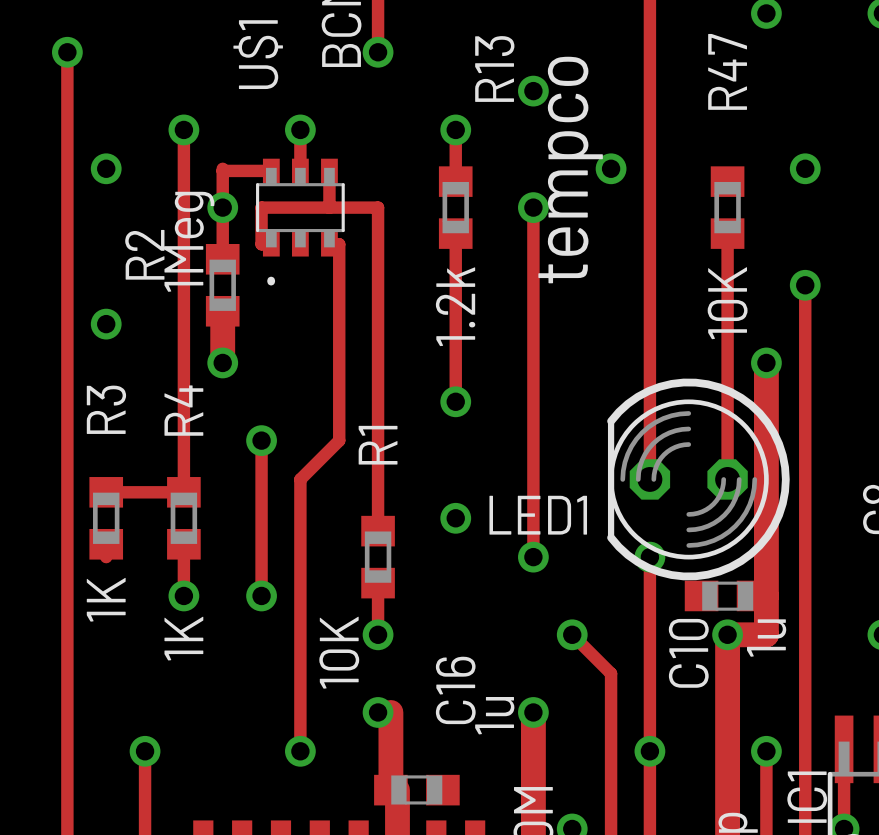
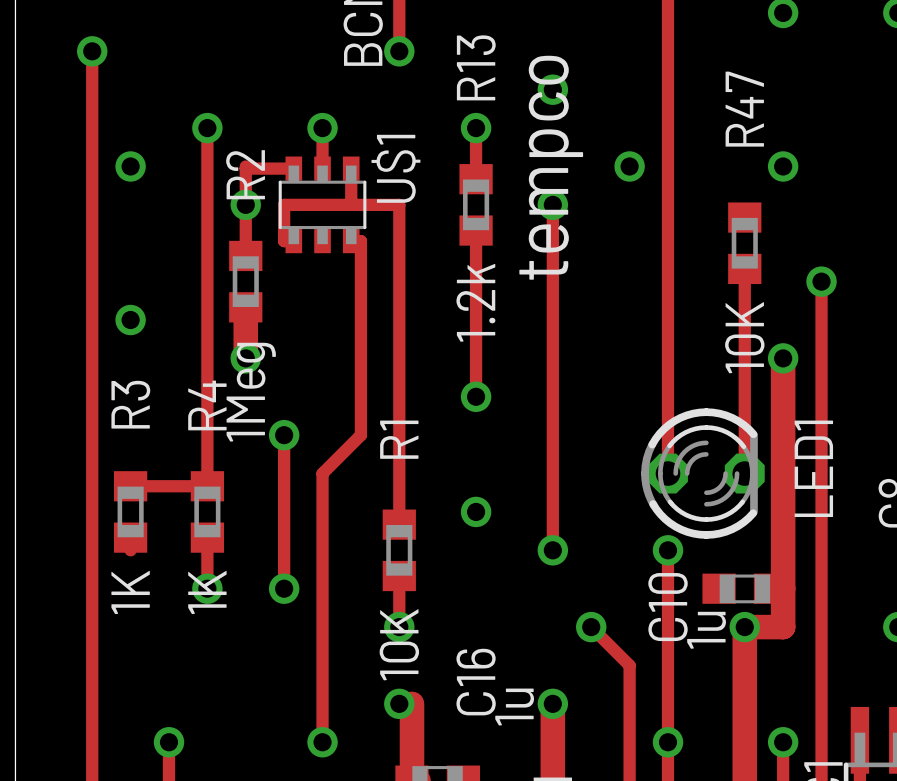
U$1 name position: U$1 (258, 54) -> U$1 (395, 168)
R13 name position: R13 (494, 69) -> R13 (476, 67)
via position: (805, 168) -> (783, 166)
text position: tempco (570, 170) -> tempco (551, 167)
R47 position: (727, 207) -> (744, 243)
track: (727, 233) (727, 272) -> none
R2 value position: 1Meg (189, 241) -> 1Meg (251, 392)
R2 name position: R2 (144, 254) -> R2 (245, 174)
text: . (271, 281) -> none
LED1 footprint: [607, 378, 790, 581] -> [641, 408, 765, 539]
LED1 name position: LED1 (538, 515) -> LED1 (813, 468)
R4 value position: 1K (183, 638) -> 1K (207, 592)
C10 value position: 1u (766, 638) -> 1u (706, 630)
R1 value position: 10K (339, 652) -> 10K (399, 644)
C10 name position: C10 (688, 653) -> C10 (668, 607)

